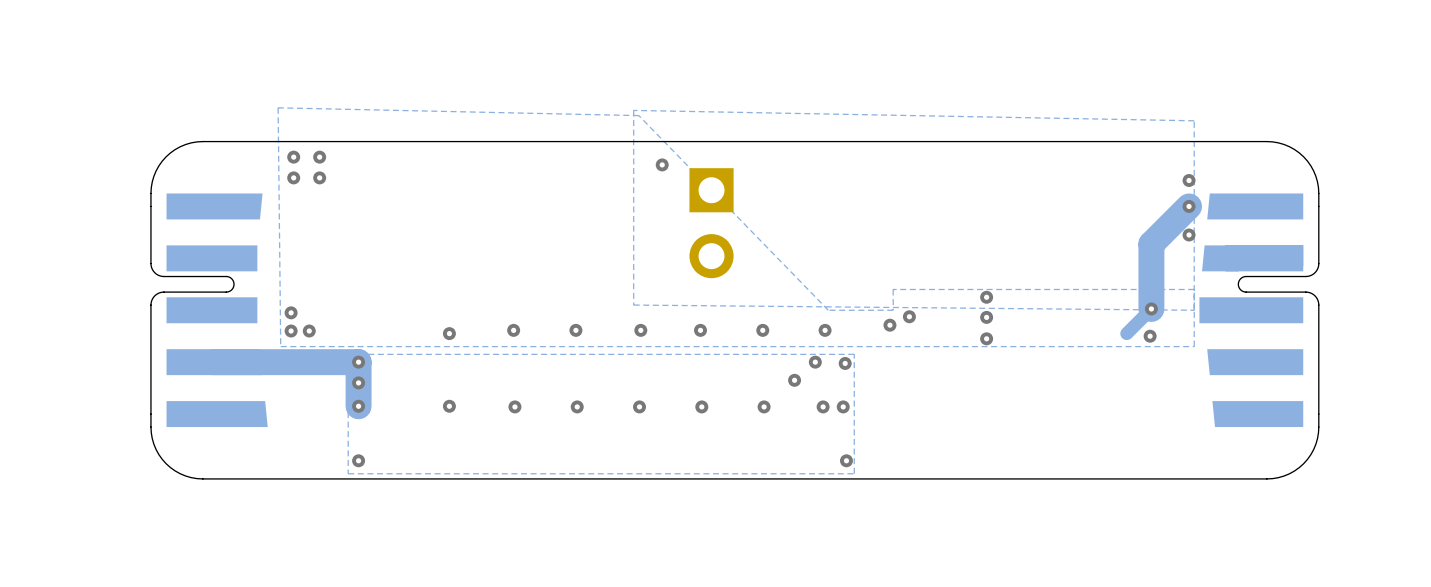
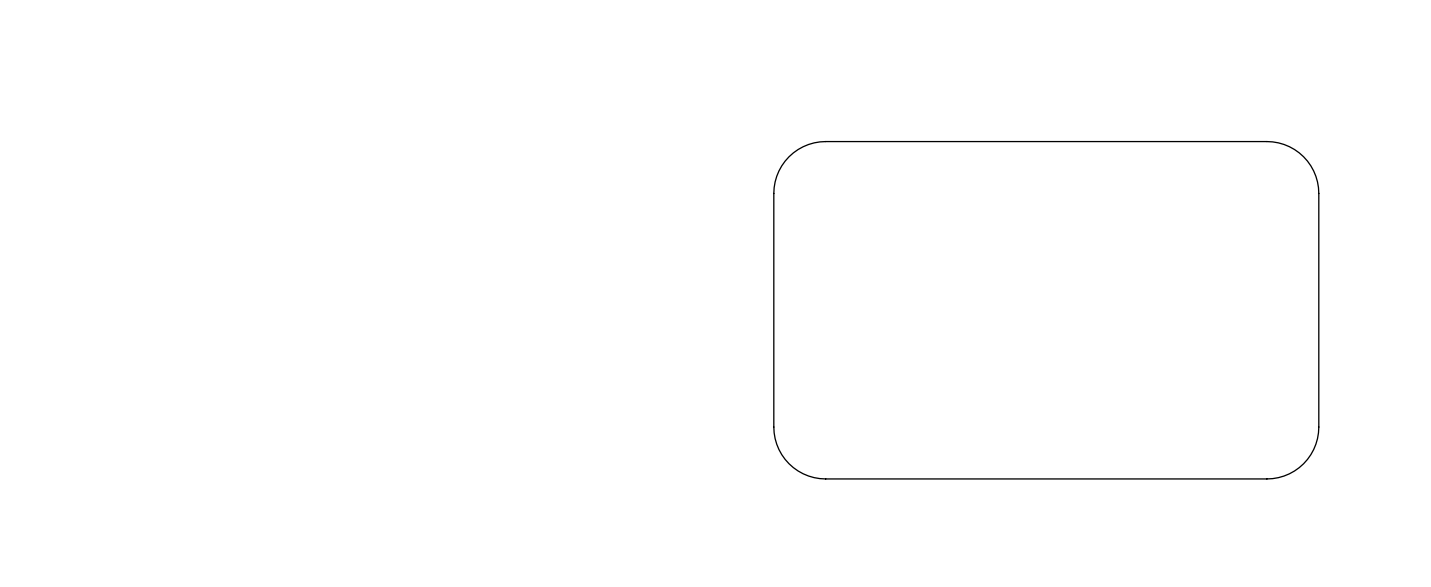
board edge: (825, 141) (197, 141) (175, 149) (162, 161) (152, 181) (150, 206) -> (825, 141) (808, 144) (789, 156) (778, 170) (773, 193) (775, 438) (781, 454) (793, 467) (808, 476) (825, 478)
via: (293, 157) -> none
via: (319, 157) -> none
via: (662, 164) -> none
via: (293, 177) -> none
via: (319, 177) -> none
via: (1189, 180) -> none
track: (1189, 206) (1151, 244) (1151, 308) (1126, 333) -> none
via: (1189, 206) -> none
board edge: none -> (1318, 206) (1318, 414)
part: (711, 223) -> none
via: (1189, 234) -> none
zone outline: (1194, 289) (893, 289) (893, 310) (828, 310) (638, 115) (278, 107) (280, 346) (1194, 346) (1194, 120) (633, 110) (633, 305) (1194, 310) -> none
via: (986, 297) -> none
via: (1151, 308) -> none
part: (209, 310) -> none
part: (1259, 310) -> none
via: (291, 312) -> none
via: (909, 316) -> none
via: (986, 317) -> none
via: (889, 325) -> none
via: (513, 330) -> none
via: (575, 330) -> none
via: (640, 330) -> none
via: (700, 330) -> none
via: (762, 330) -> none
via: (825, 330) -> none
via: (291, 331) -> none
via: (309, 331) -> none
via: (449, 333) -> none
via: (1150, 336) -> none
via: (986, 338) -> none
zone outline: (854, 354) (854, 473) (348, 473) (348, 354) (854, 354) -> none
track: (358, 362) (358, 406) (358, 362) -> none
track: (358, 362) (213, 362) -> none
via: (358, 362) -> none
via: (815, 362) -> none
via: (845, 363) -> none
via: (794, 380) -> none
via: (358, 382) -> none
via: (358, 406) -> none
via: (449, 406) -> none
via: (514, 406) -> none
via: (577, 406) -> none
via: (639, 406) -> none
via: (701, 406) -> none
via: (764, 406) -> none
via: (823, 406) -> none
via: (843, 406) -> none
board edge: (150, 414) (152, 438) (162, 459) (175, 470) (197, 478) (825, 478) -> none
via: (358, 460) -> none
via: (846, 460) -> none

